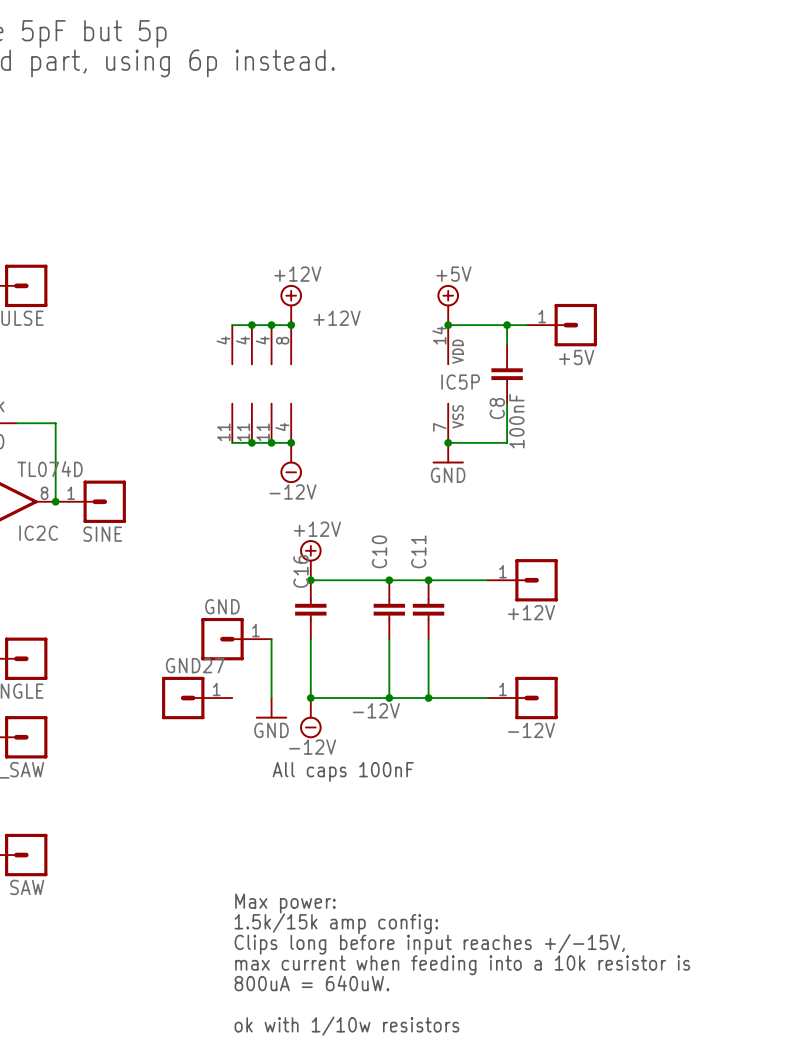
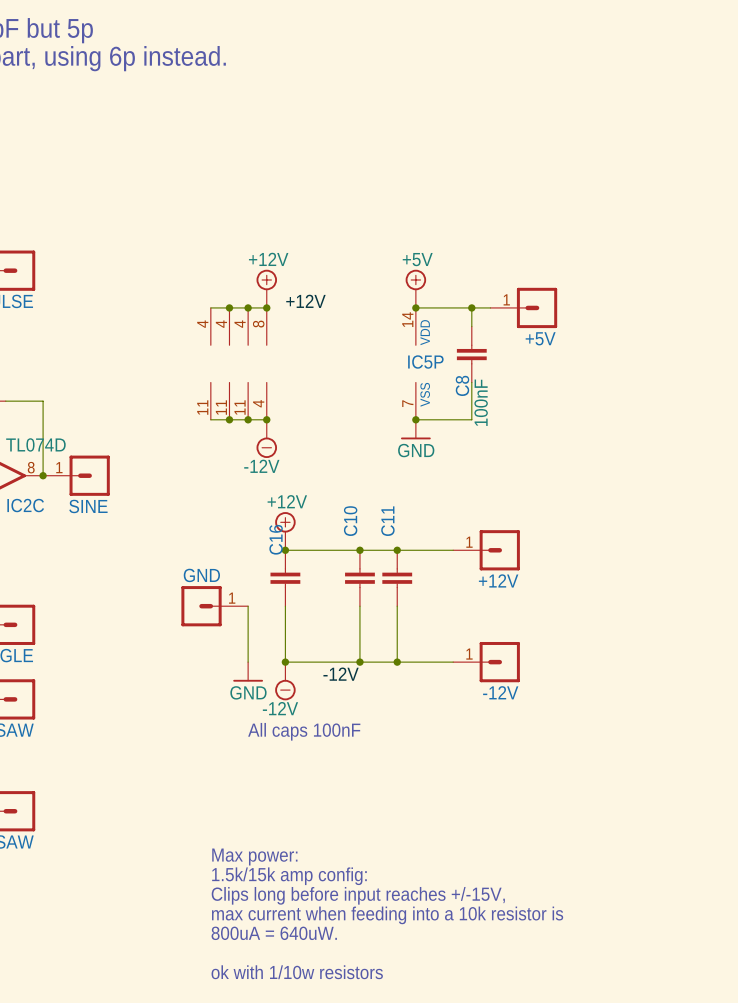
GND27: (197, 698) -> none

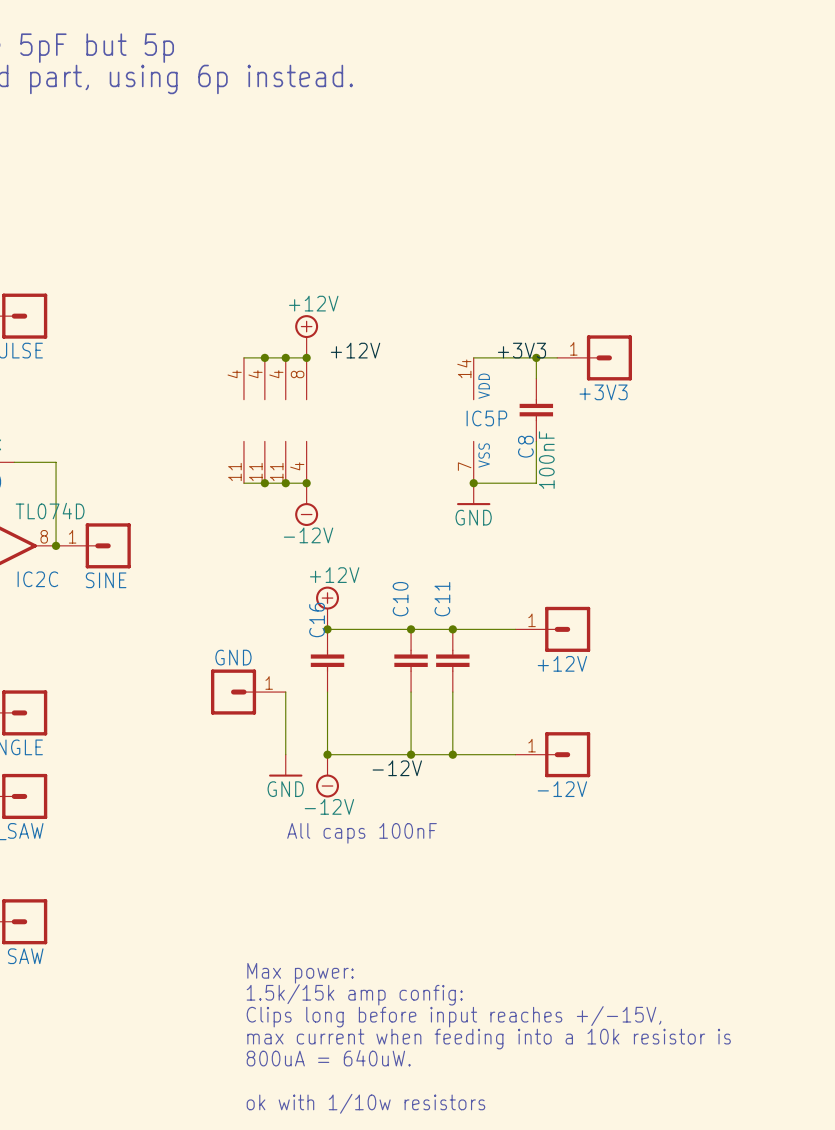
power symbol: +5V (415, 288) -> none
label: none -> +3V3 (521, 350)
junction: (415, 307) -> none
+5V name: +5V (540, 338) -> +3V3 (603, 392)

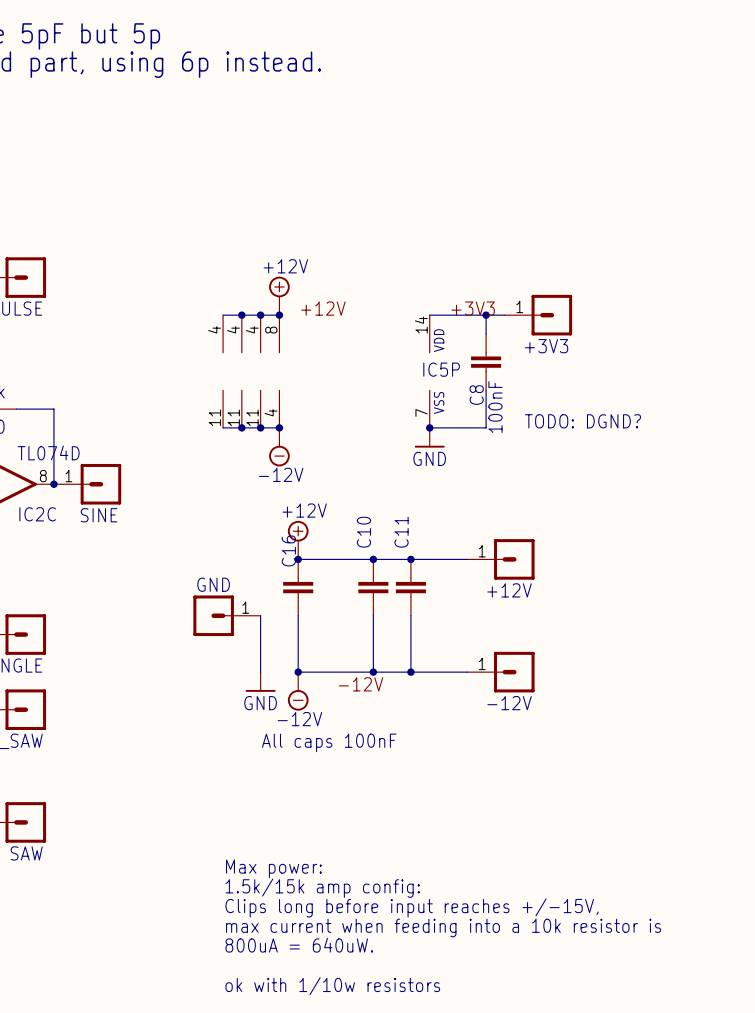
text: none -> TODO: DGND? (582, 421)

